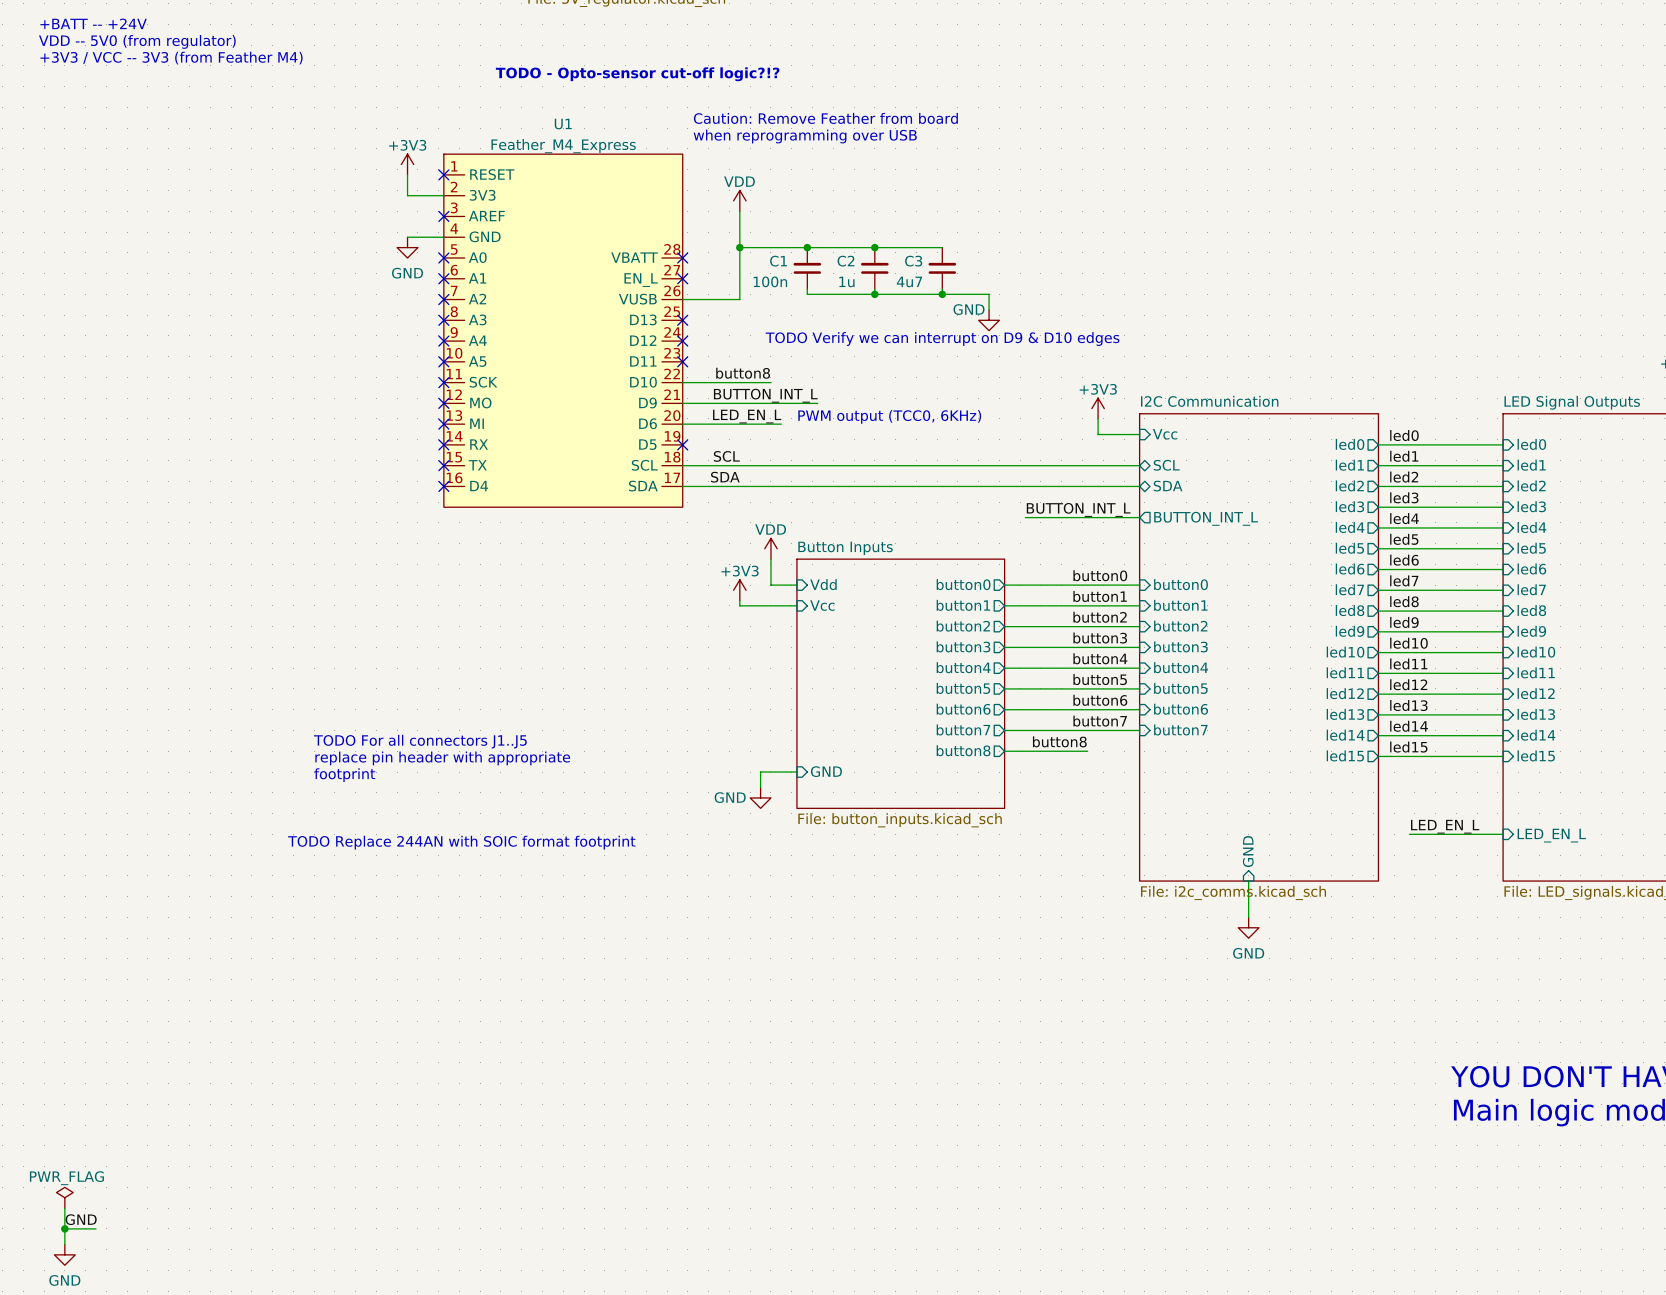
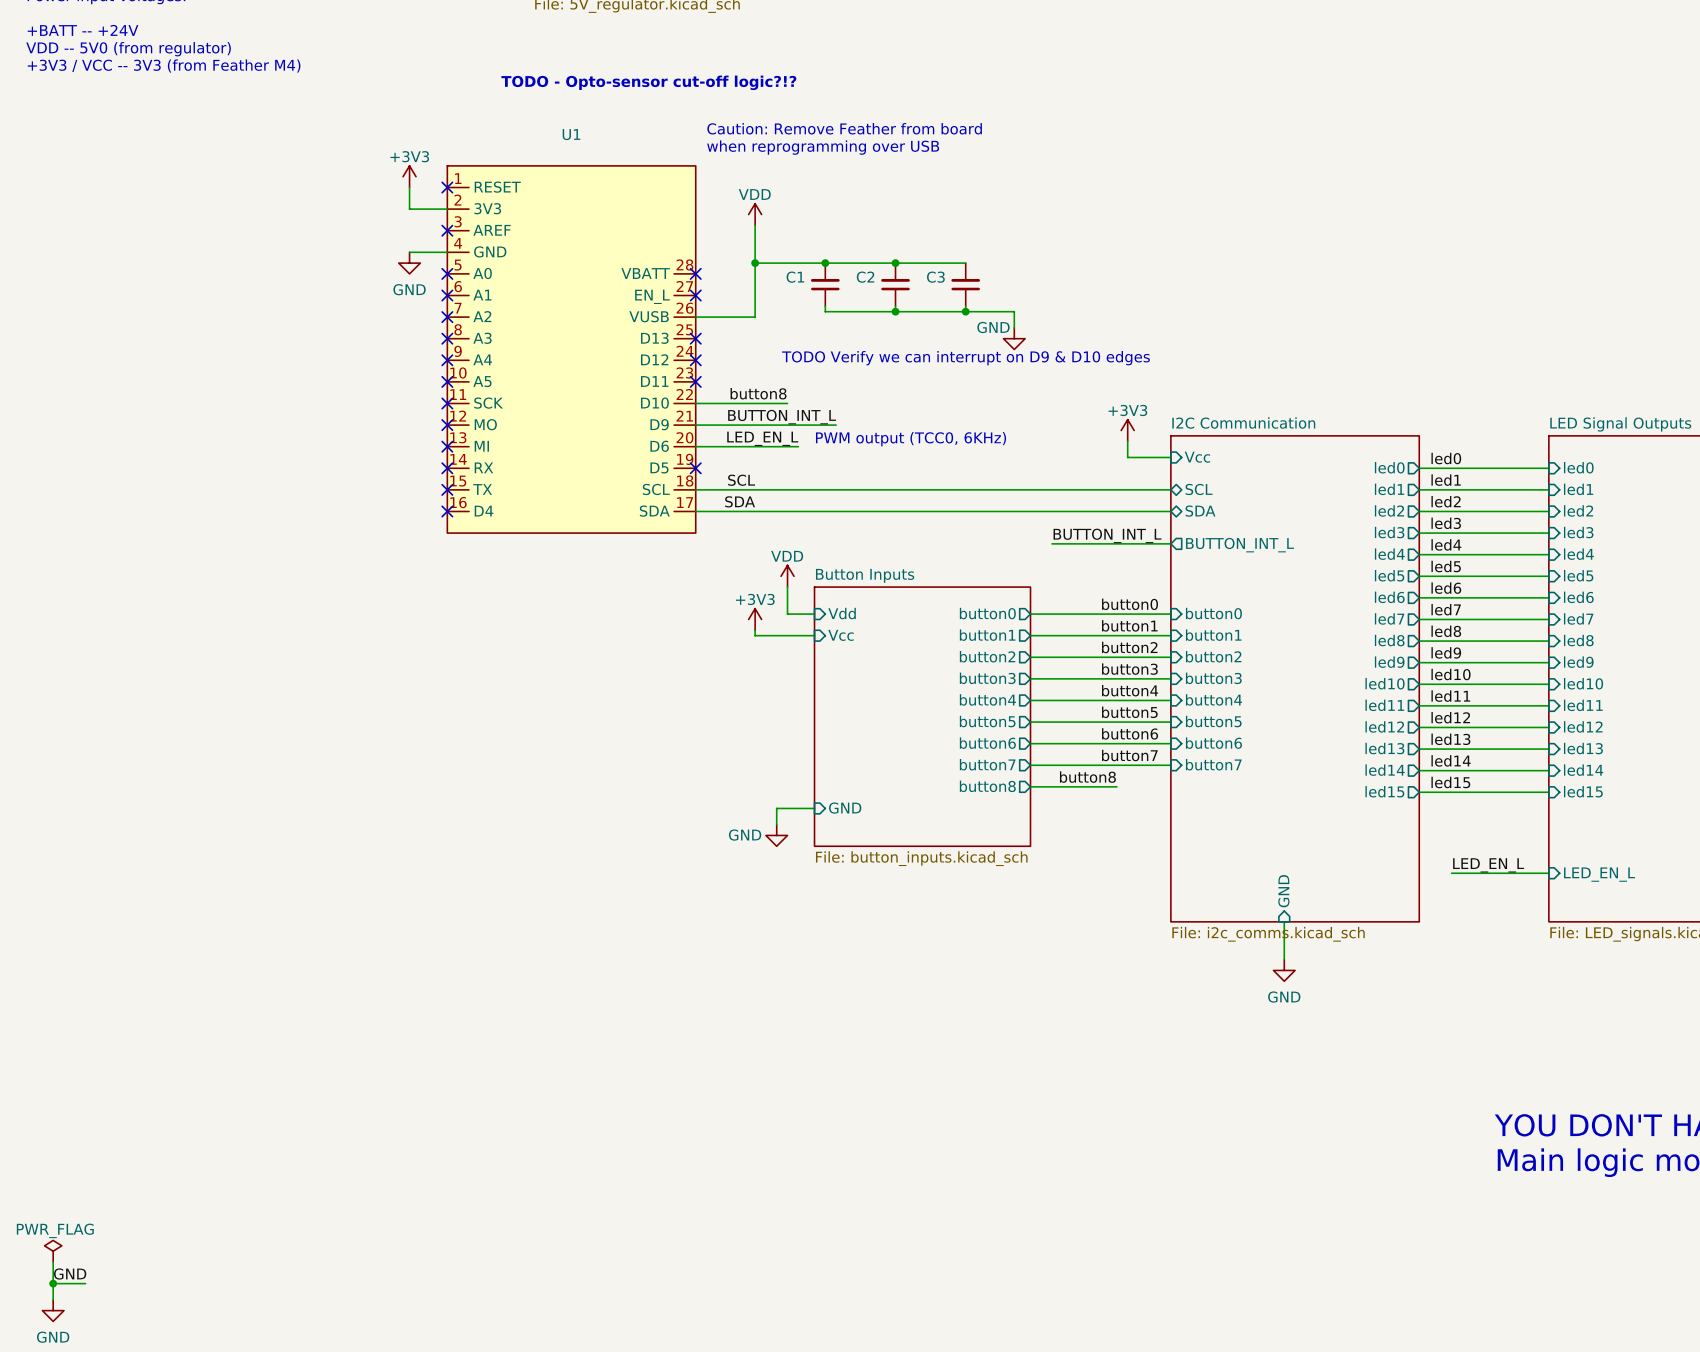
U1 value: Feather_M4_Express (563, 146) -> none
C1 value: 100n (770, 281) -> none
C2 value: 1u (846, 281) -> none
C3 value: 4u7 (909, 281) -> none
text: TODO For all connectors J1..J5 (420, 741) -> none
text: replace pin header with appropriate (442, 758) -> none
text: footprint (344, 775) -> none
text: TODO Replace 244AN with SOIC format footprint (461, 842) -> none

